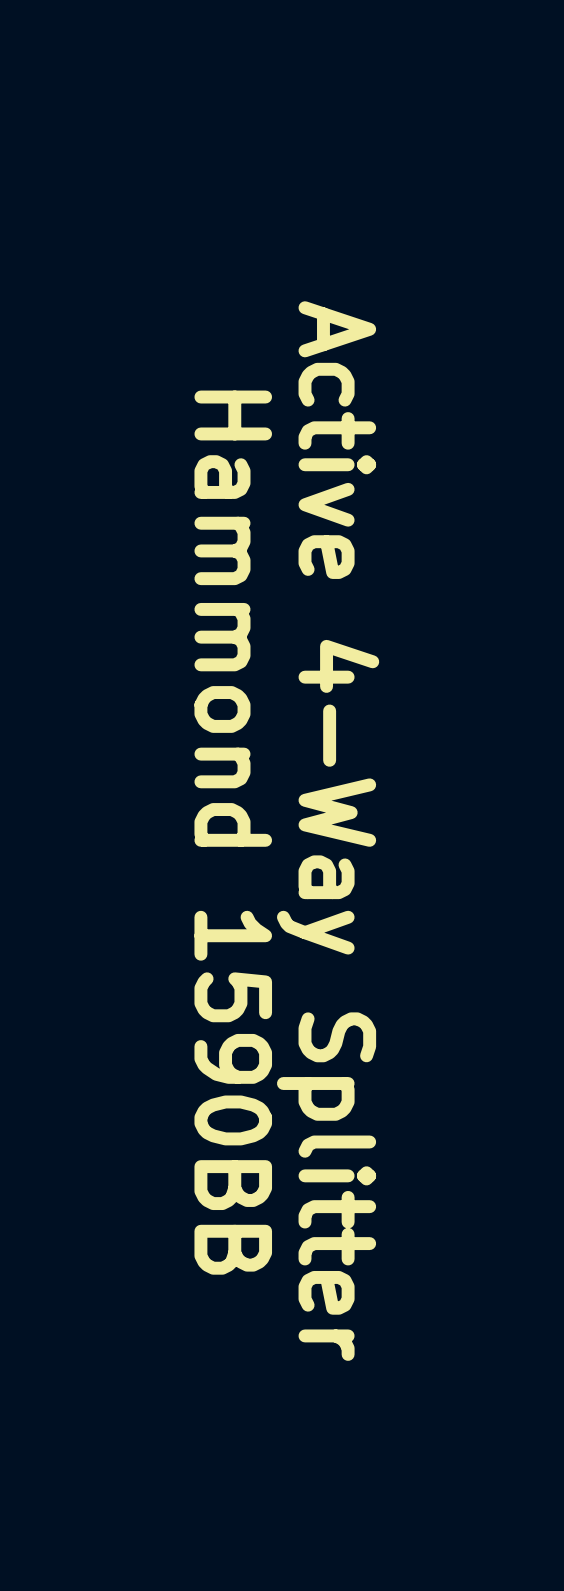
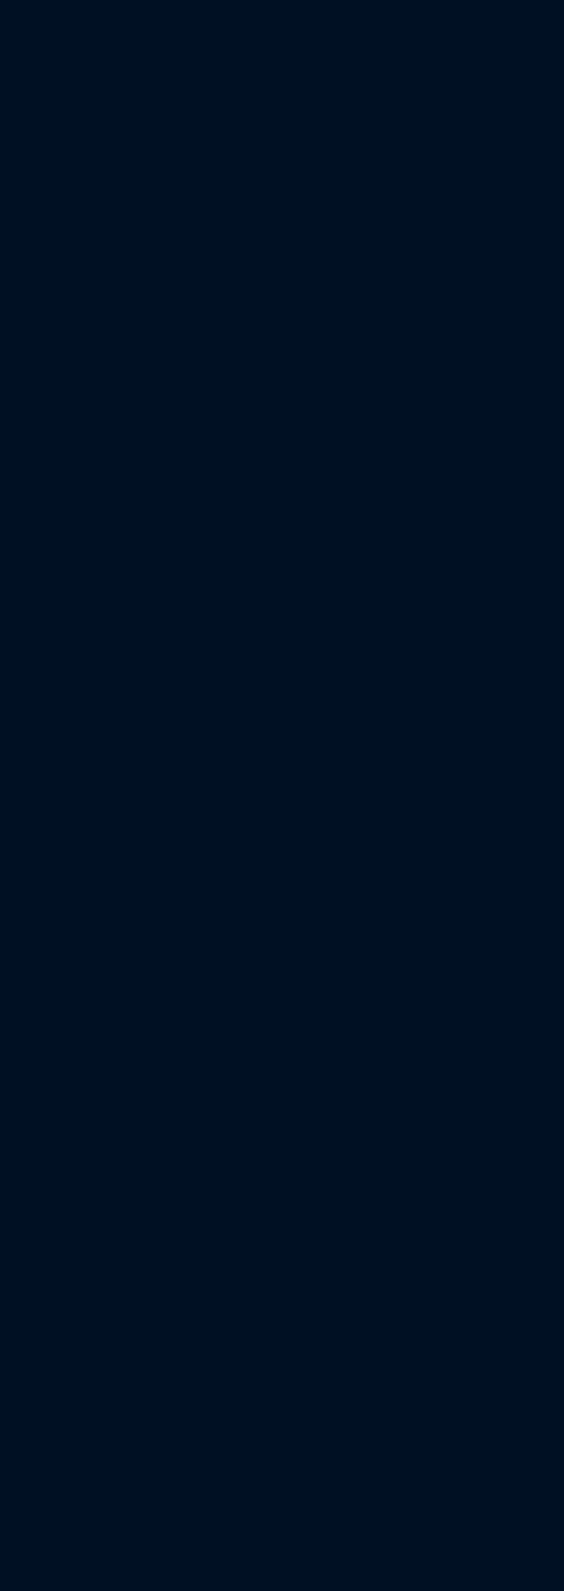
text: Active 4-Way Splitter (328, 831) -> none
text: Hammond 1590BB (233, 832) -> none

